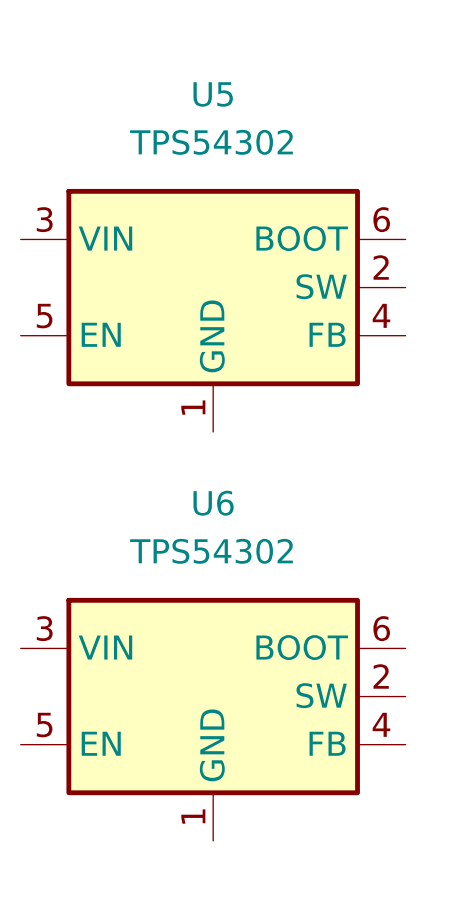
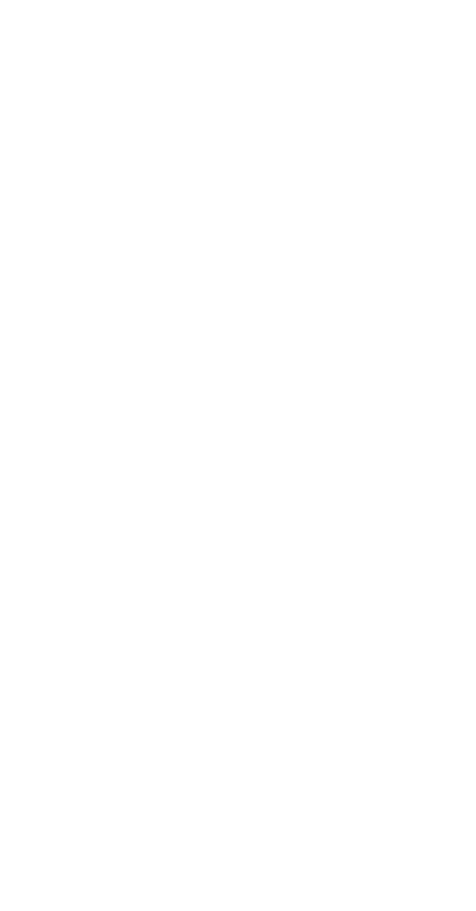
U5: TPS54302 (213, 310) -> none
U6: TPS54302 (213, 719) -> none

